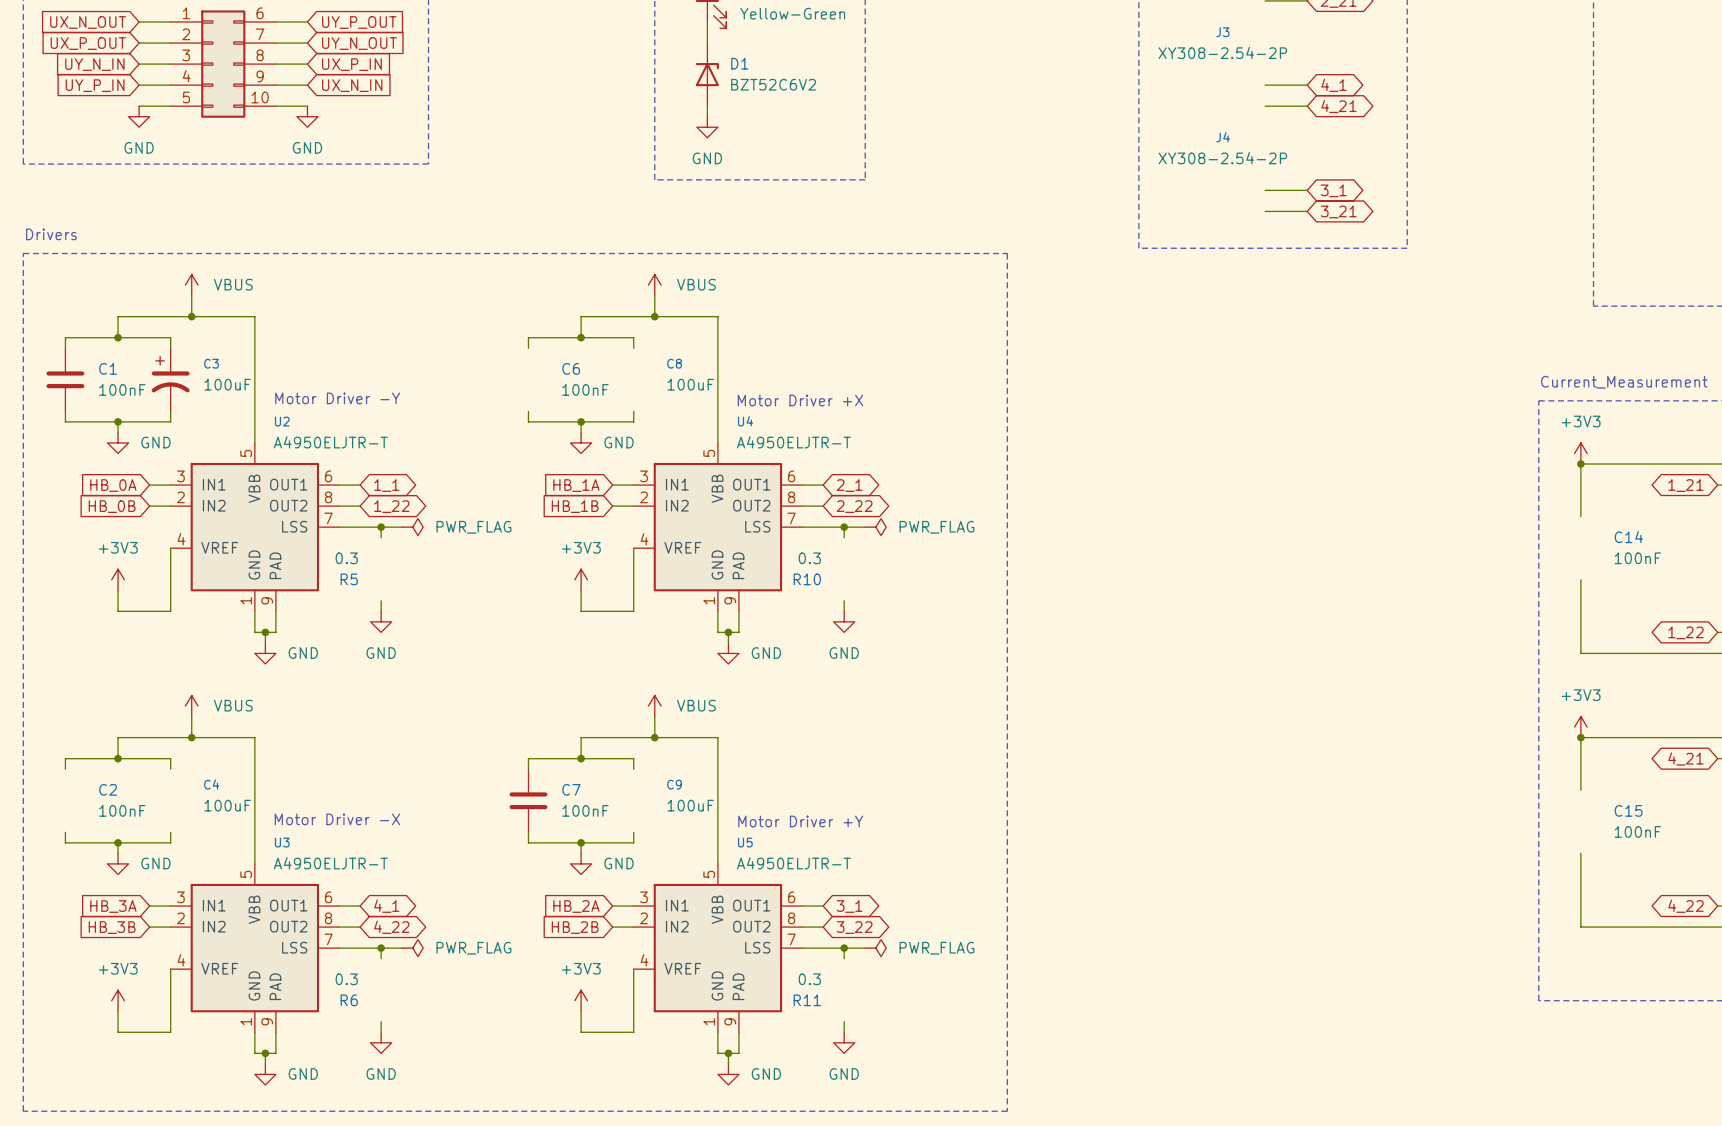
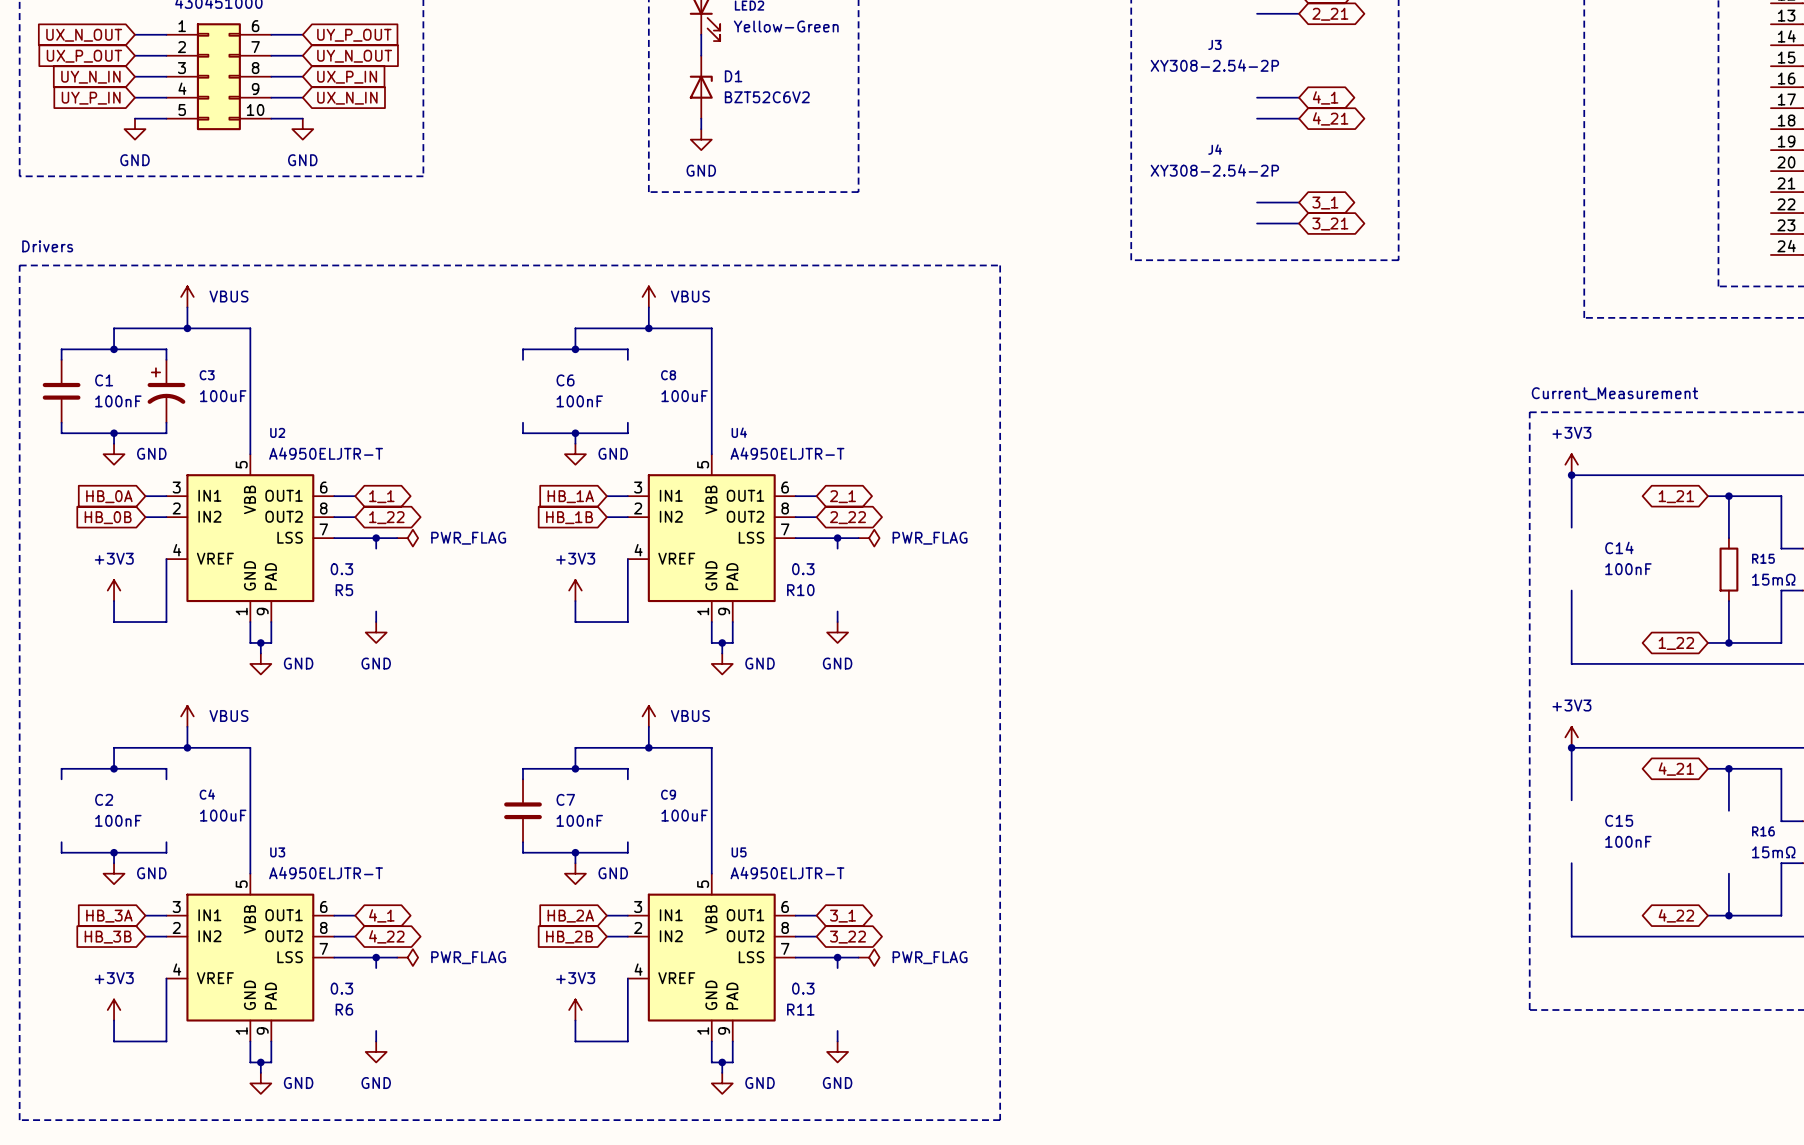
text: Motor Driver -Y (337, 398) -> none
text: Motor Driver +X (800, 400) -> none
text: Motor Driver -X (337, 819) -> none
text: Motor Driver +Y (800, 821) -> none

